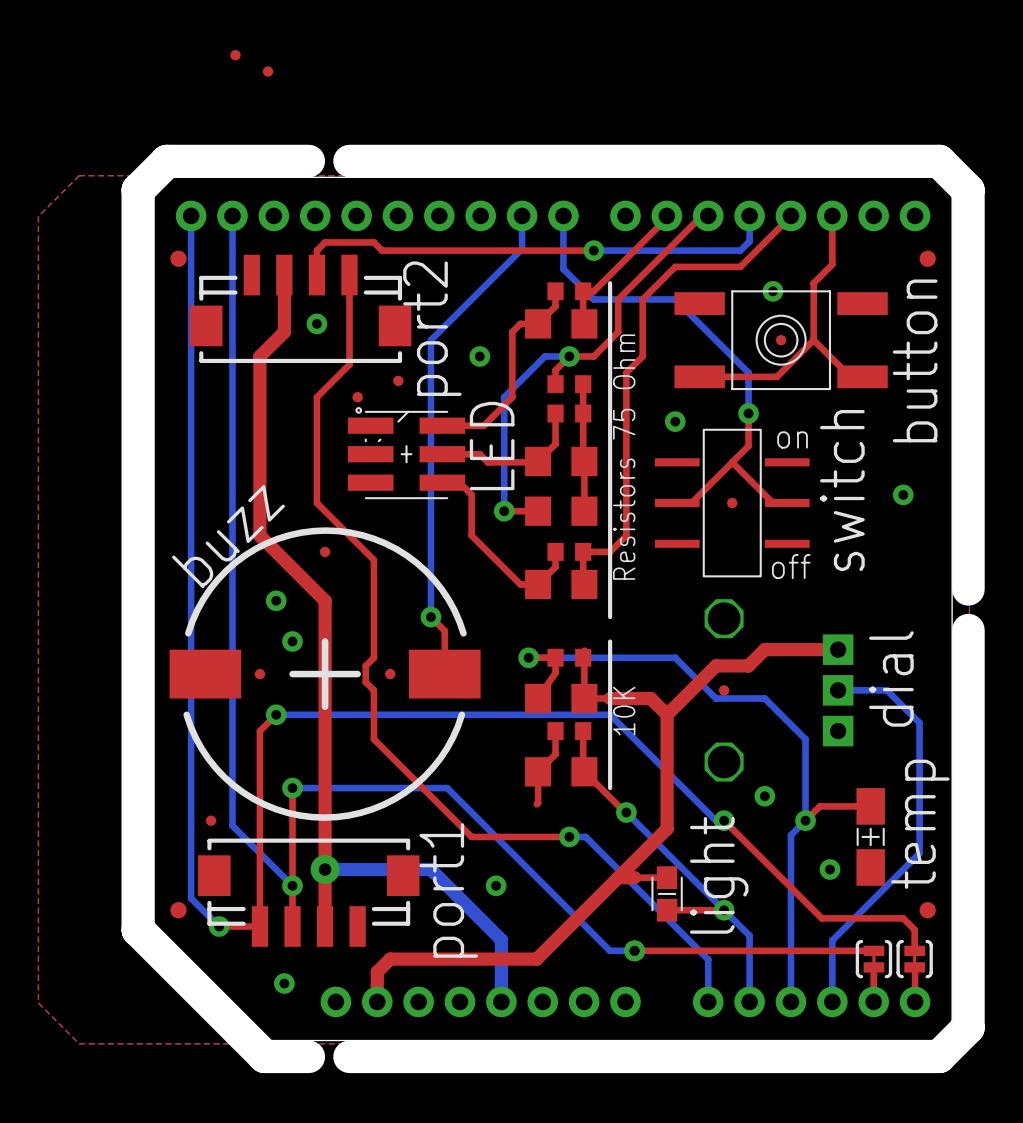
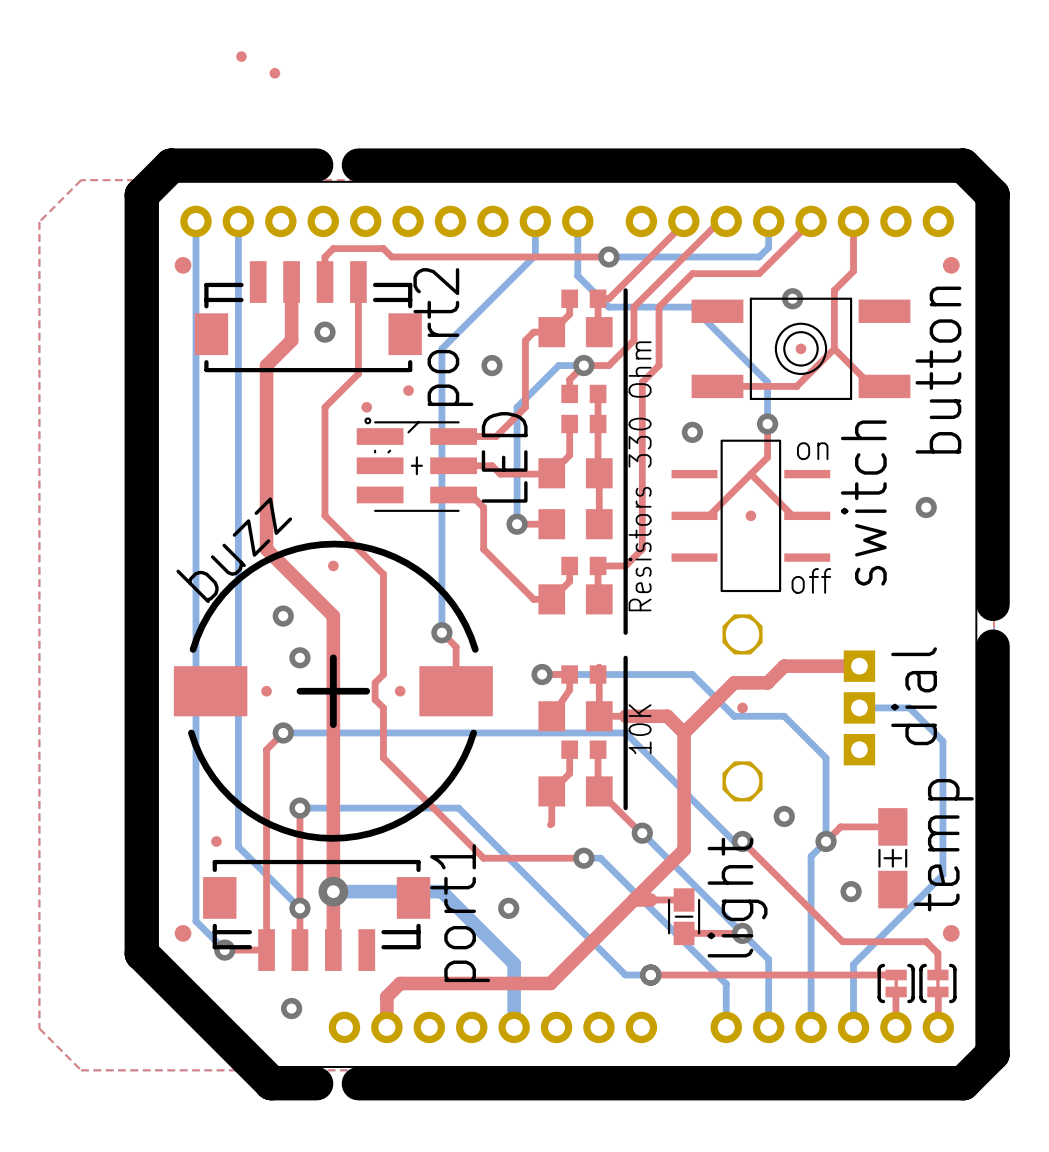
text: Resistors 75 Ohm (624, 457) -> Resistors 330 Ohm (640, 476)

